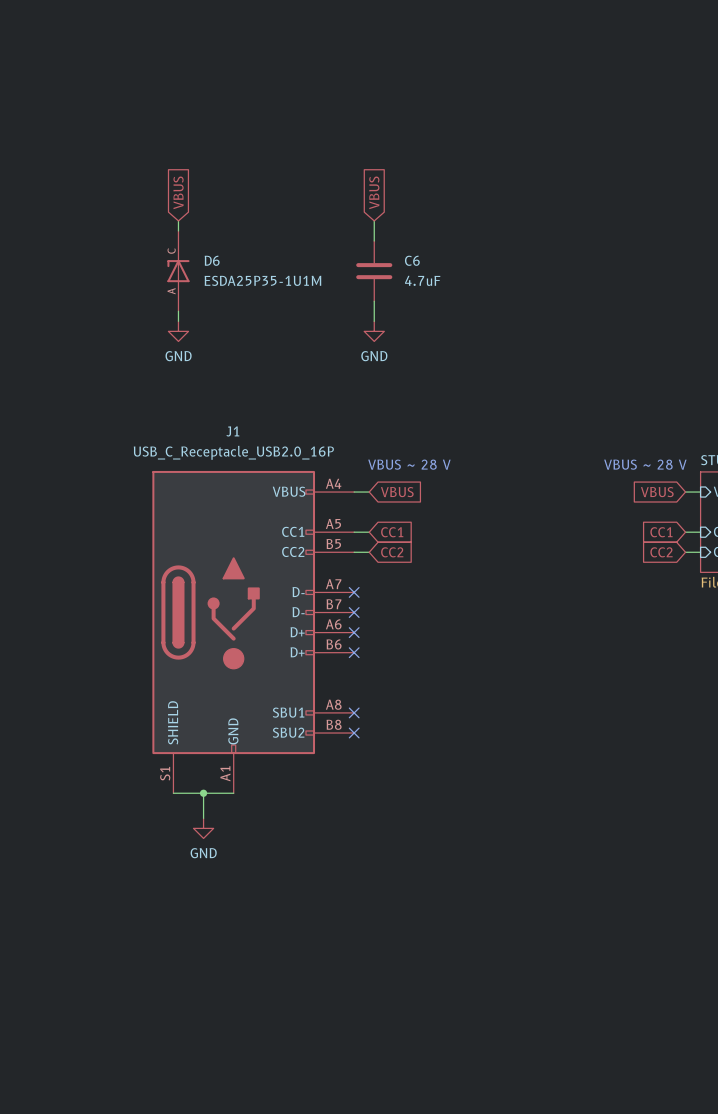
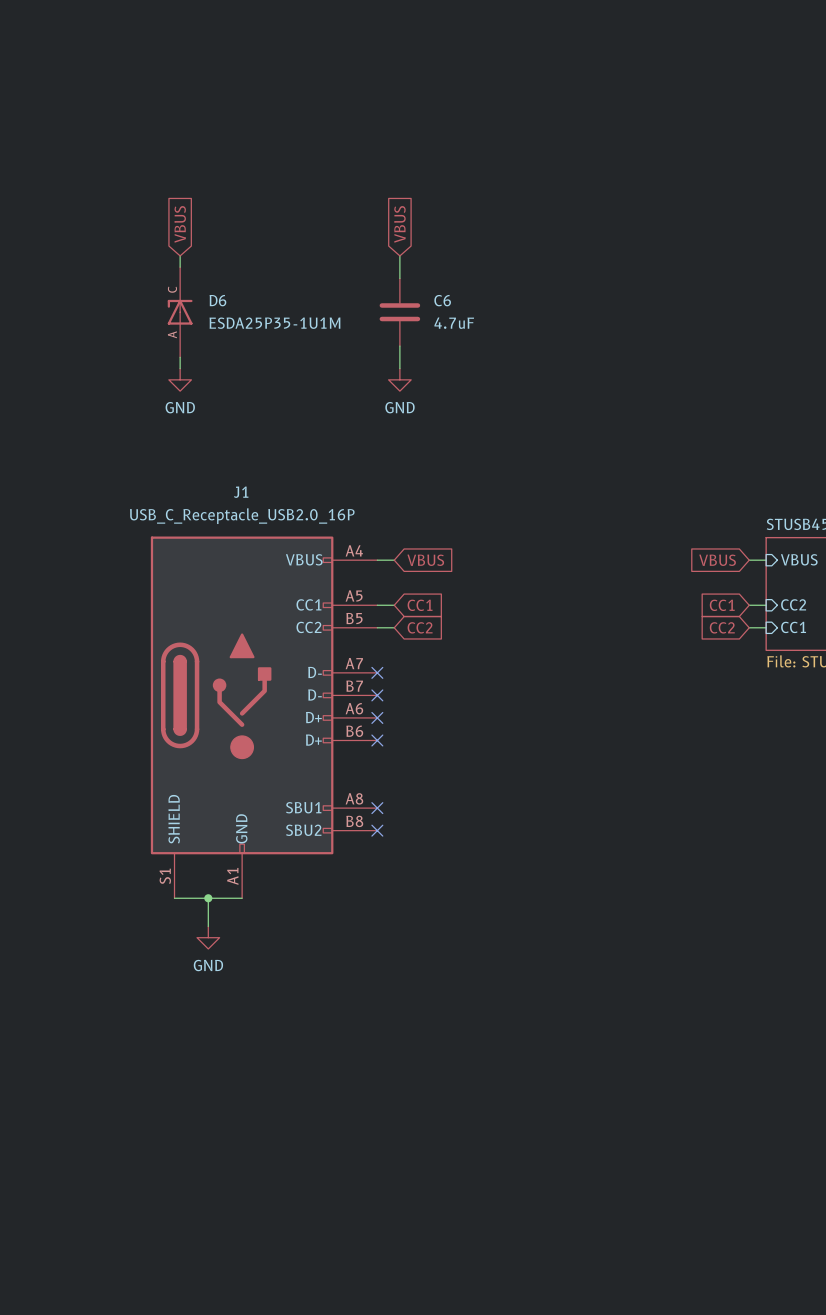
text: VBUS ~ 28 V (409, 464) -> none
text: VBUS ~ 28 V (645, 464) -> none

